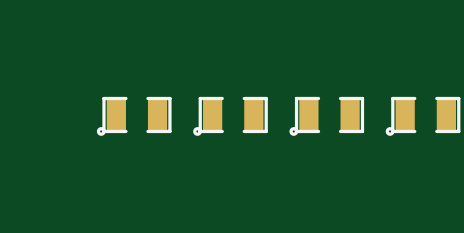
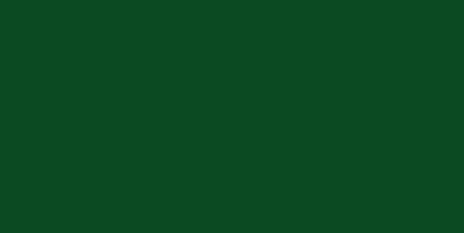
part: (134, 116) -> none
part: (230, 116) -> none
part: (326, 116) -> none
part: (423, 116) -> none

